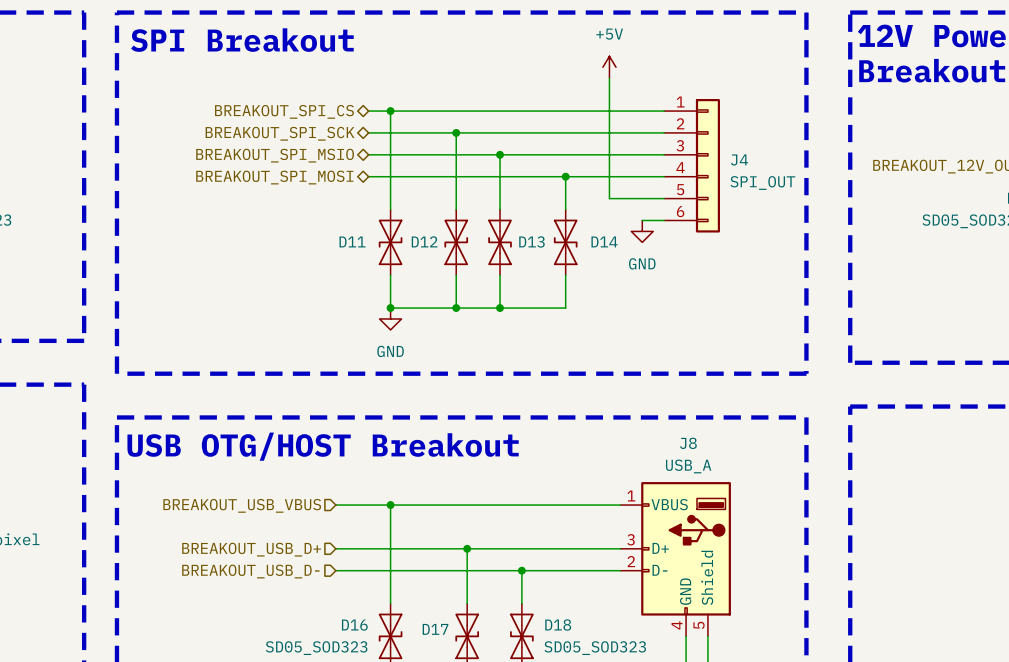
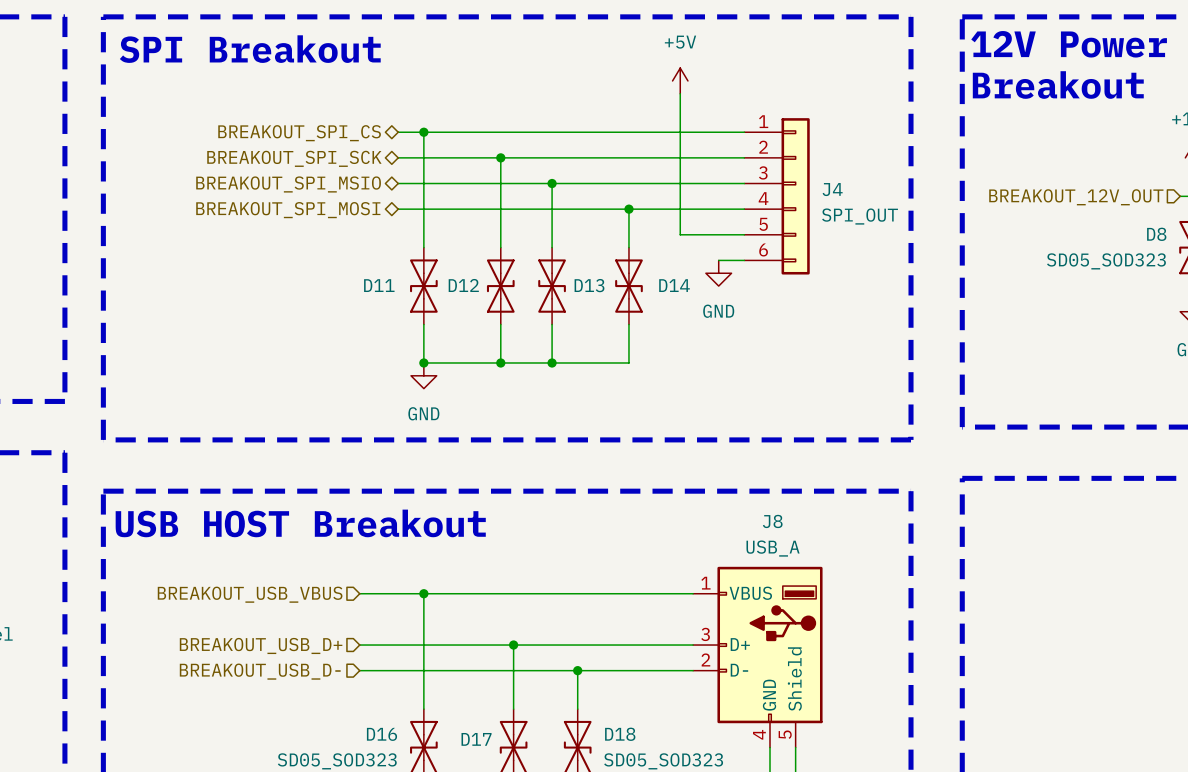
text: USB OTG/HOST Breakout (323, 446) -> USB HOST Breakout (300, 523)

